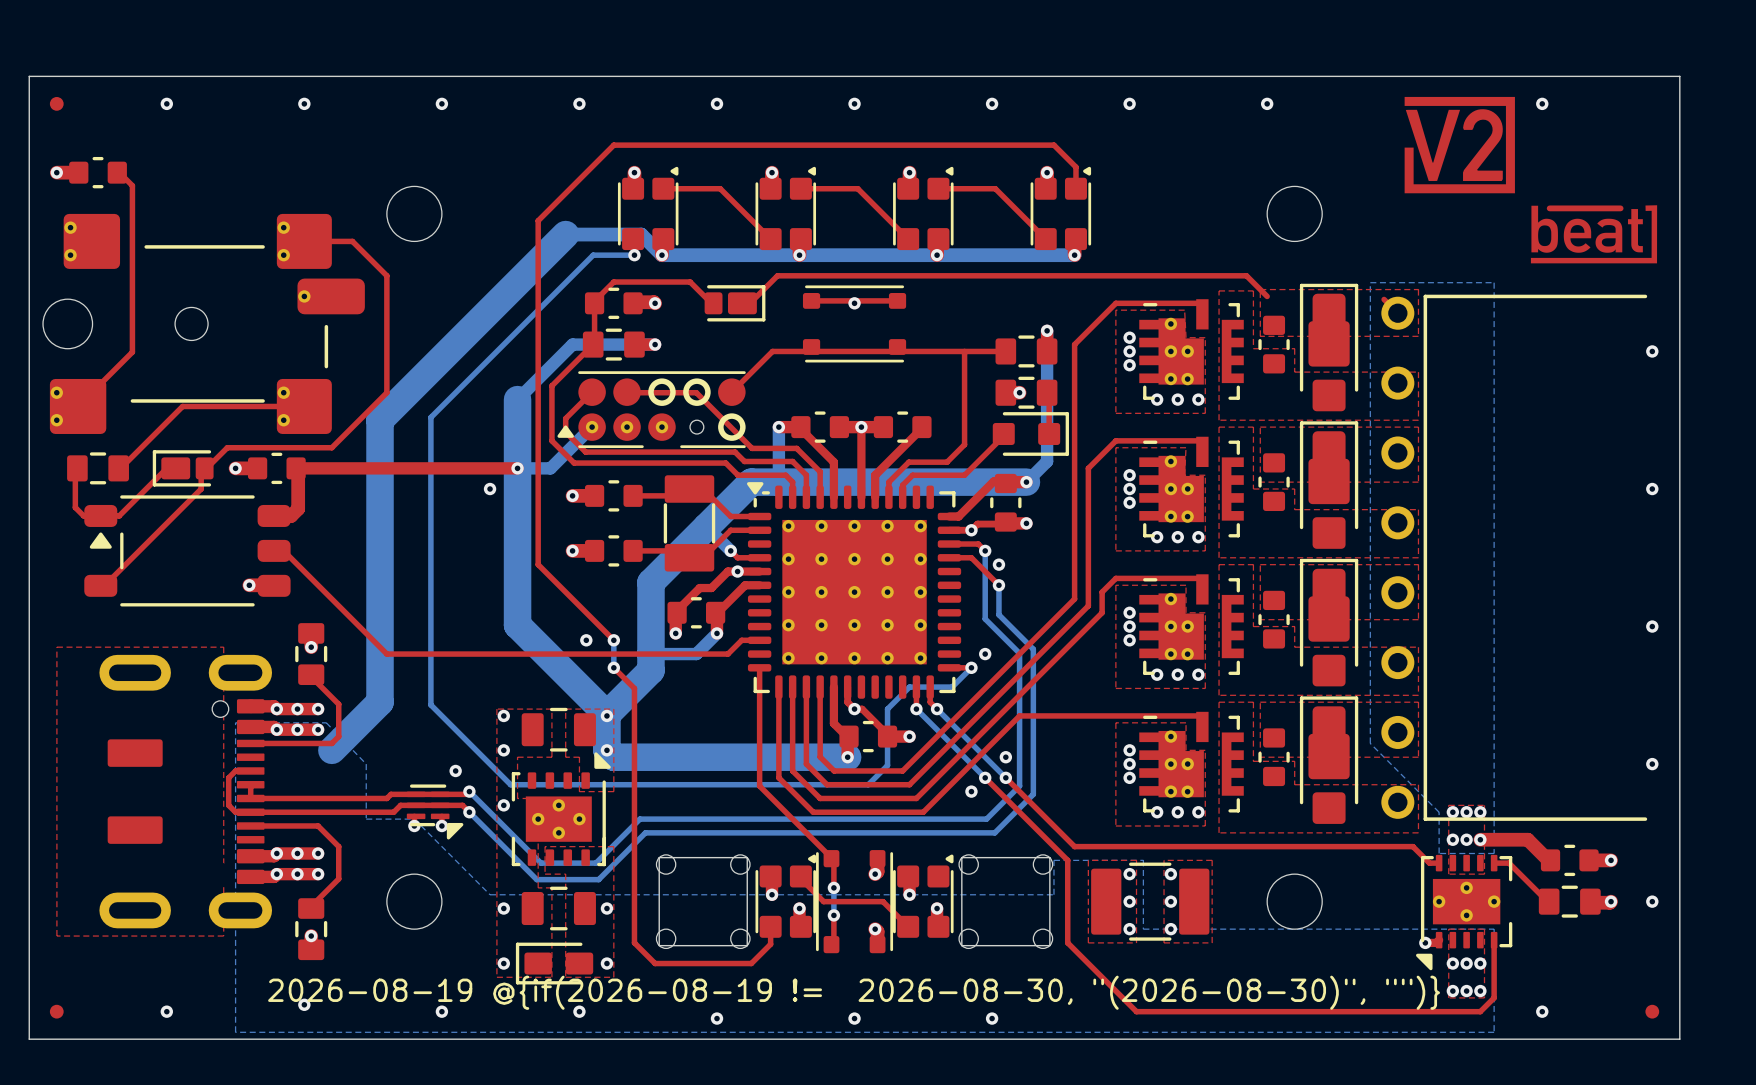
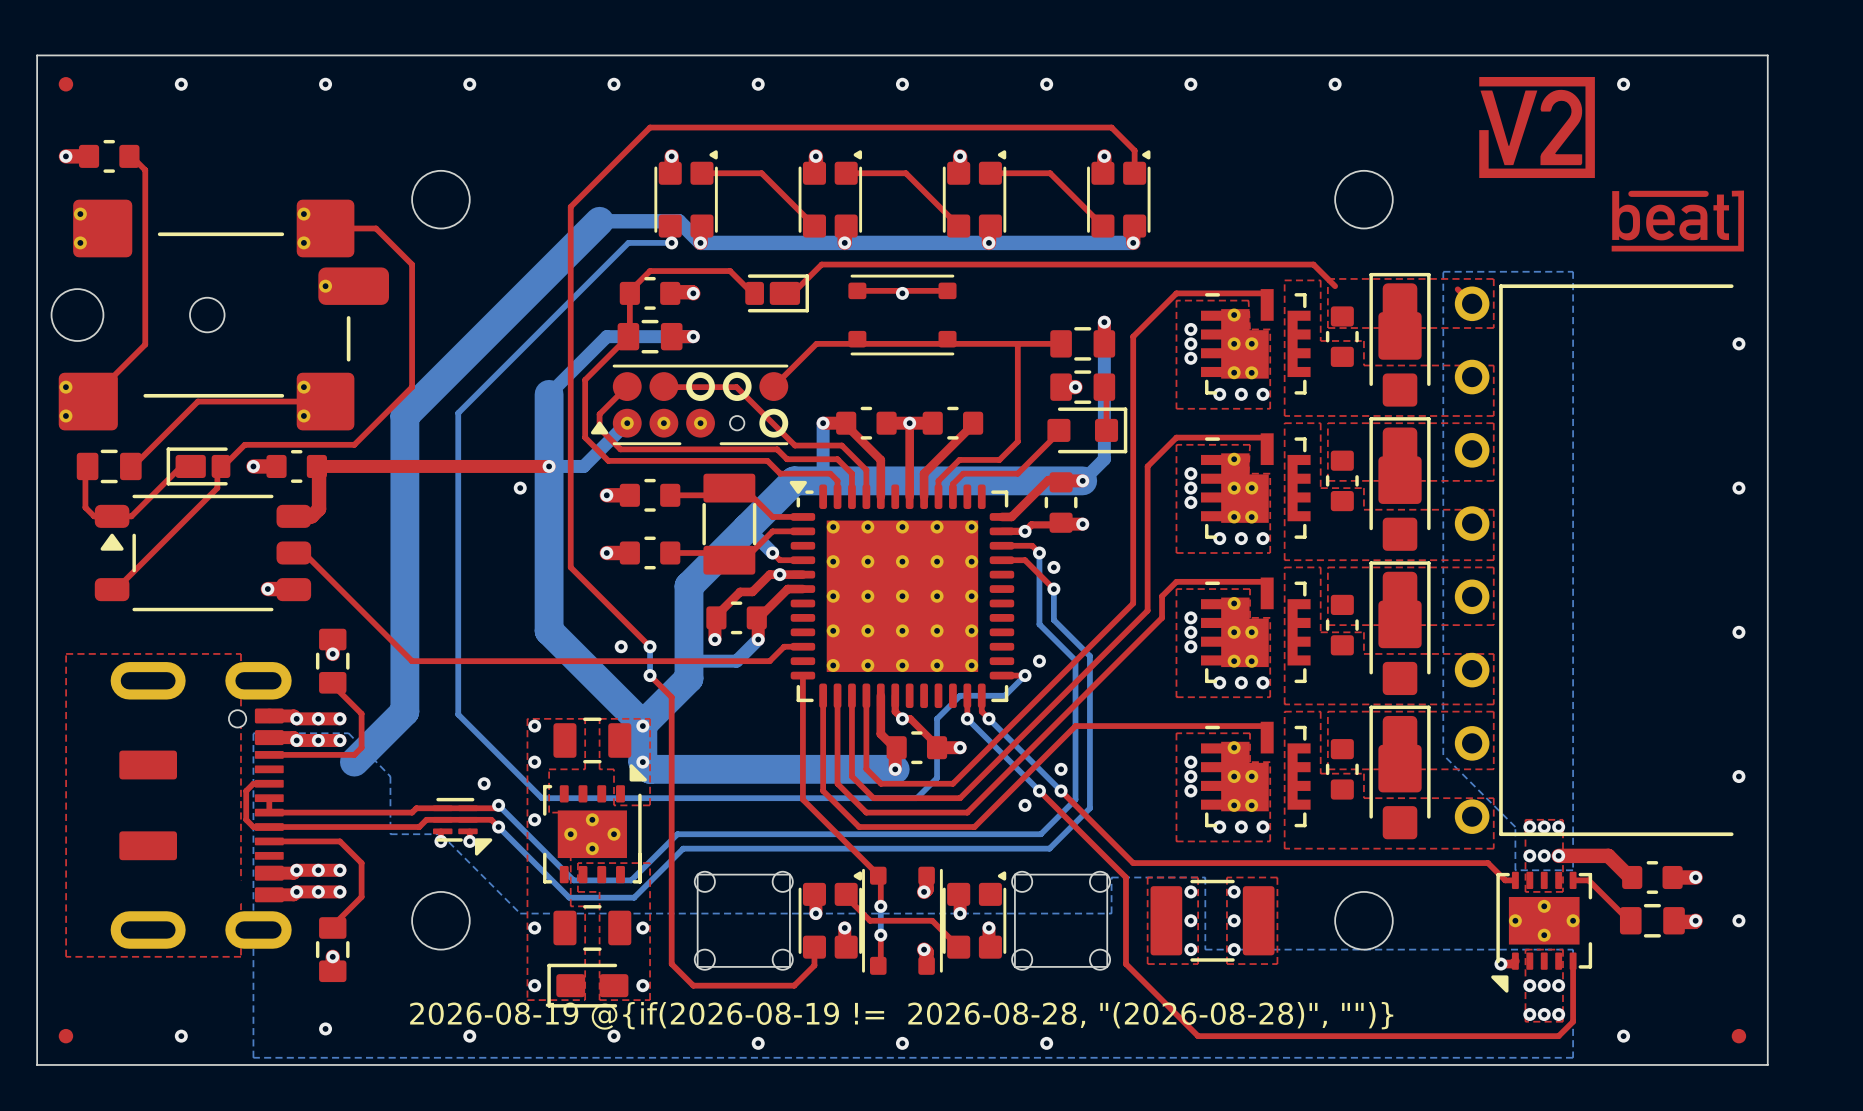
drawing shape: [268, 975, 1440, 1010] -> [410, 1001, 1394, 1030]

